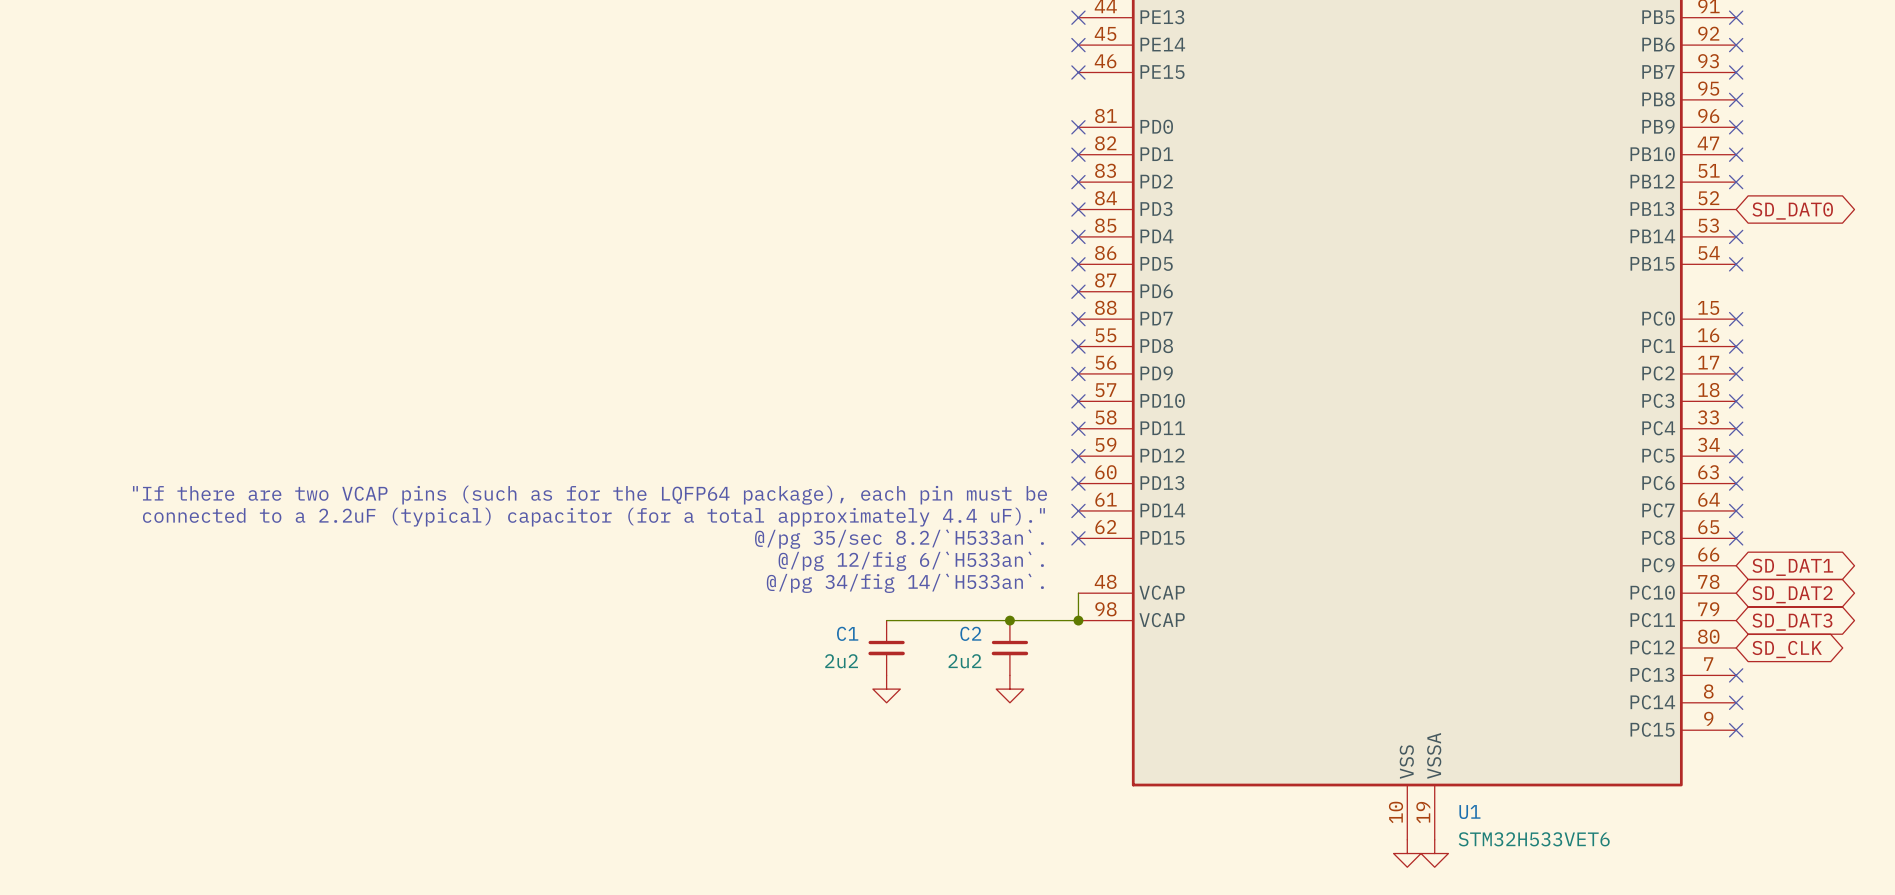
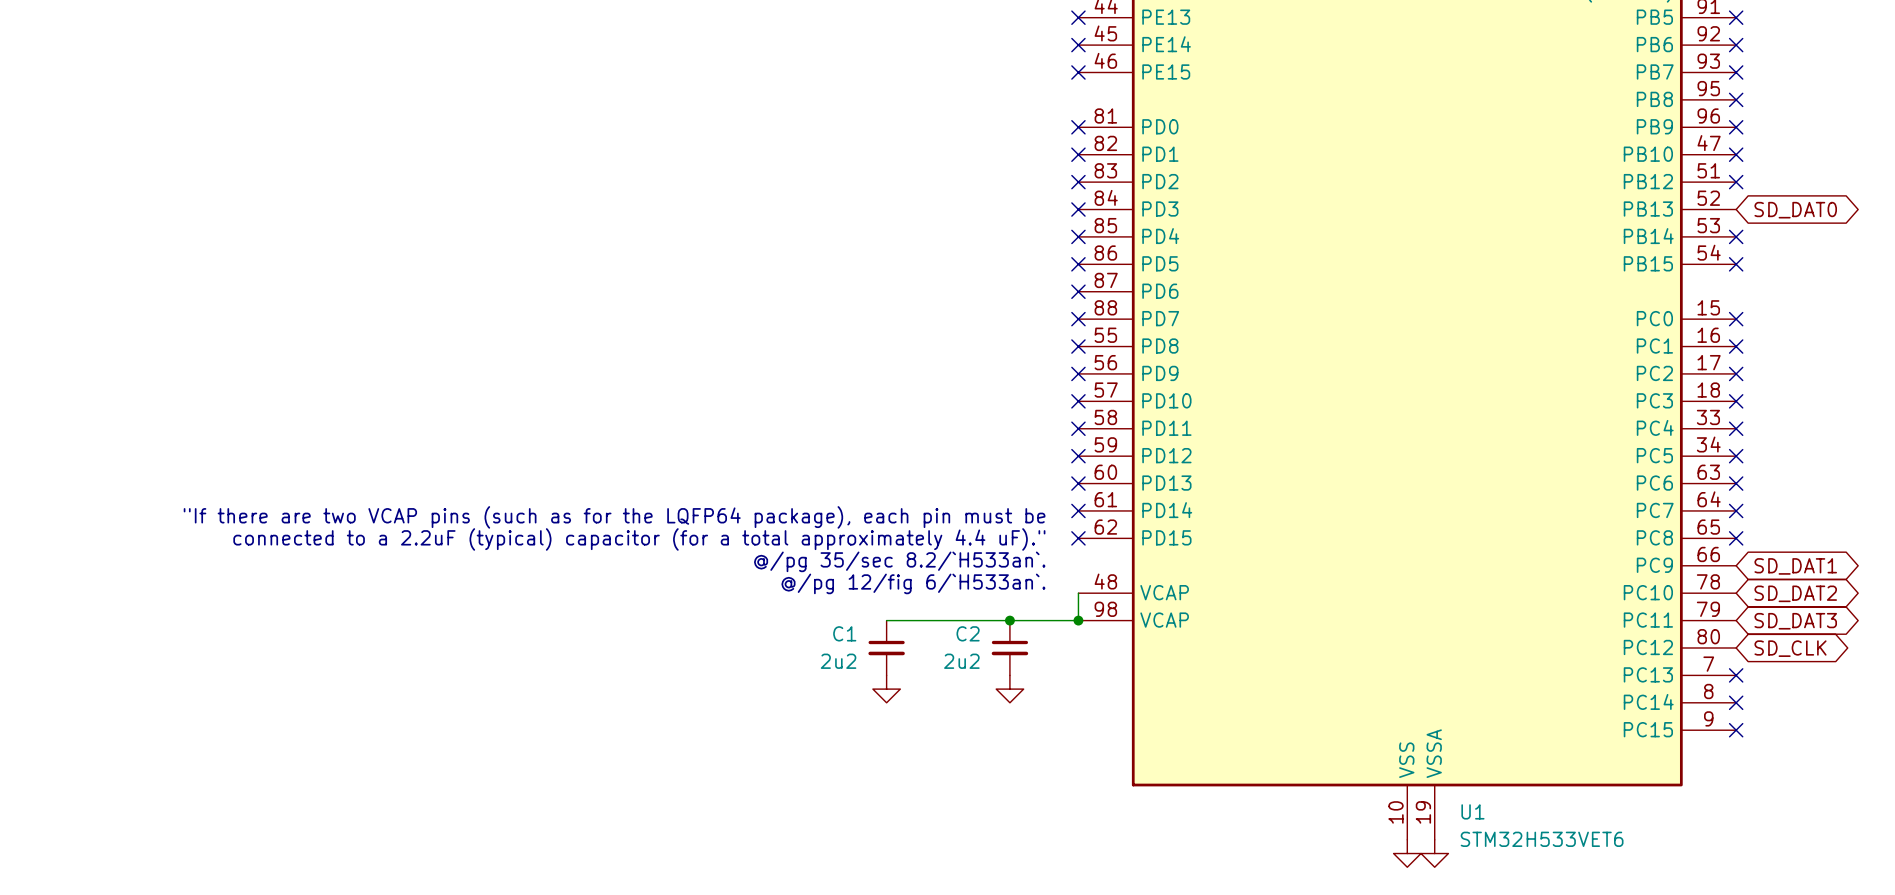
text: "If there are two VCAP pins (such as for the LQFP64 package), each pin must be (589, 495) -> none
text: connected to a 2.2uF (typical) capacitor (for a total approximately 4.4 uF)." (593, 517) -> "If there are two VCAP pins (such as for the LQFP64 package), each pin must be (614, 517)
text: @/pg 35/sec 8.2/`H533an`. (899, 539) -> connected to a 2.2uF (typical) capacitor (for a total approximately 4.4 uF)." (639, 539)
text: @/pg 12/fig 6/`H533an`. (911, 561) -> @/pg 35/sec 8.2/`H533an`. (899, 561)
text: @/pg 34/fig 14/`H533an`. (905, 583) -> @/pg 12/fig 6/`H533an`. (913, 583)

